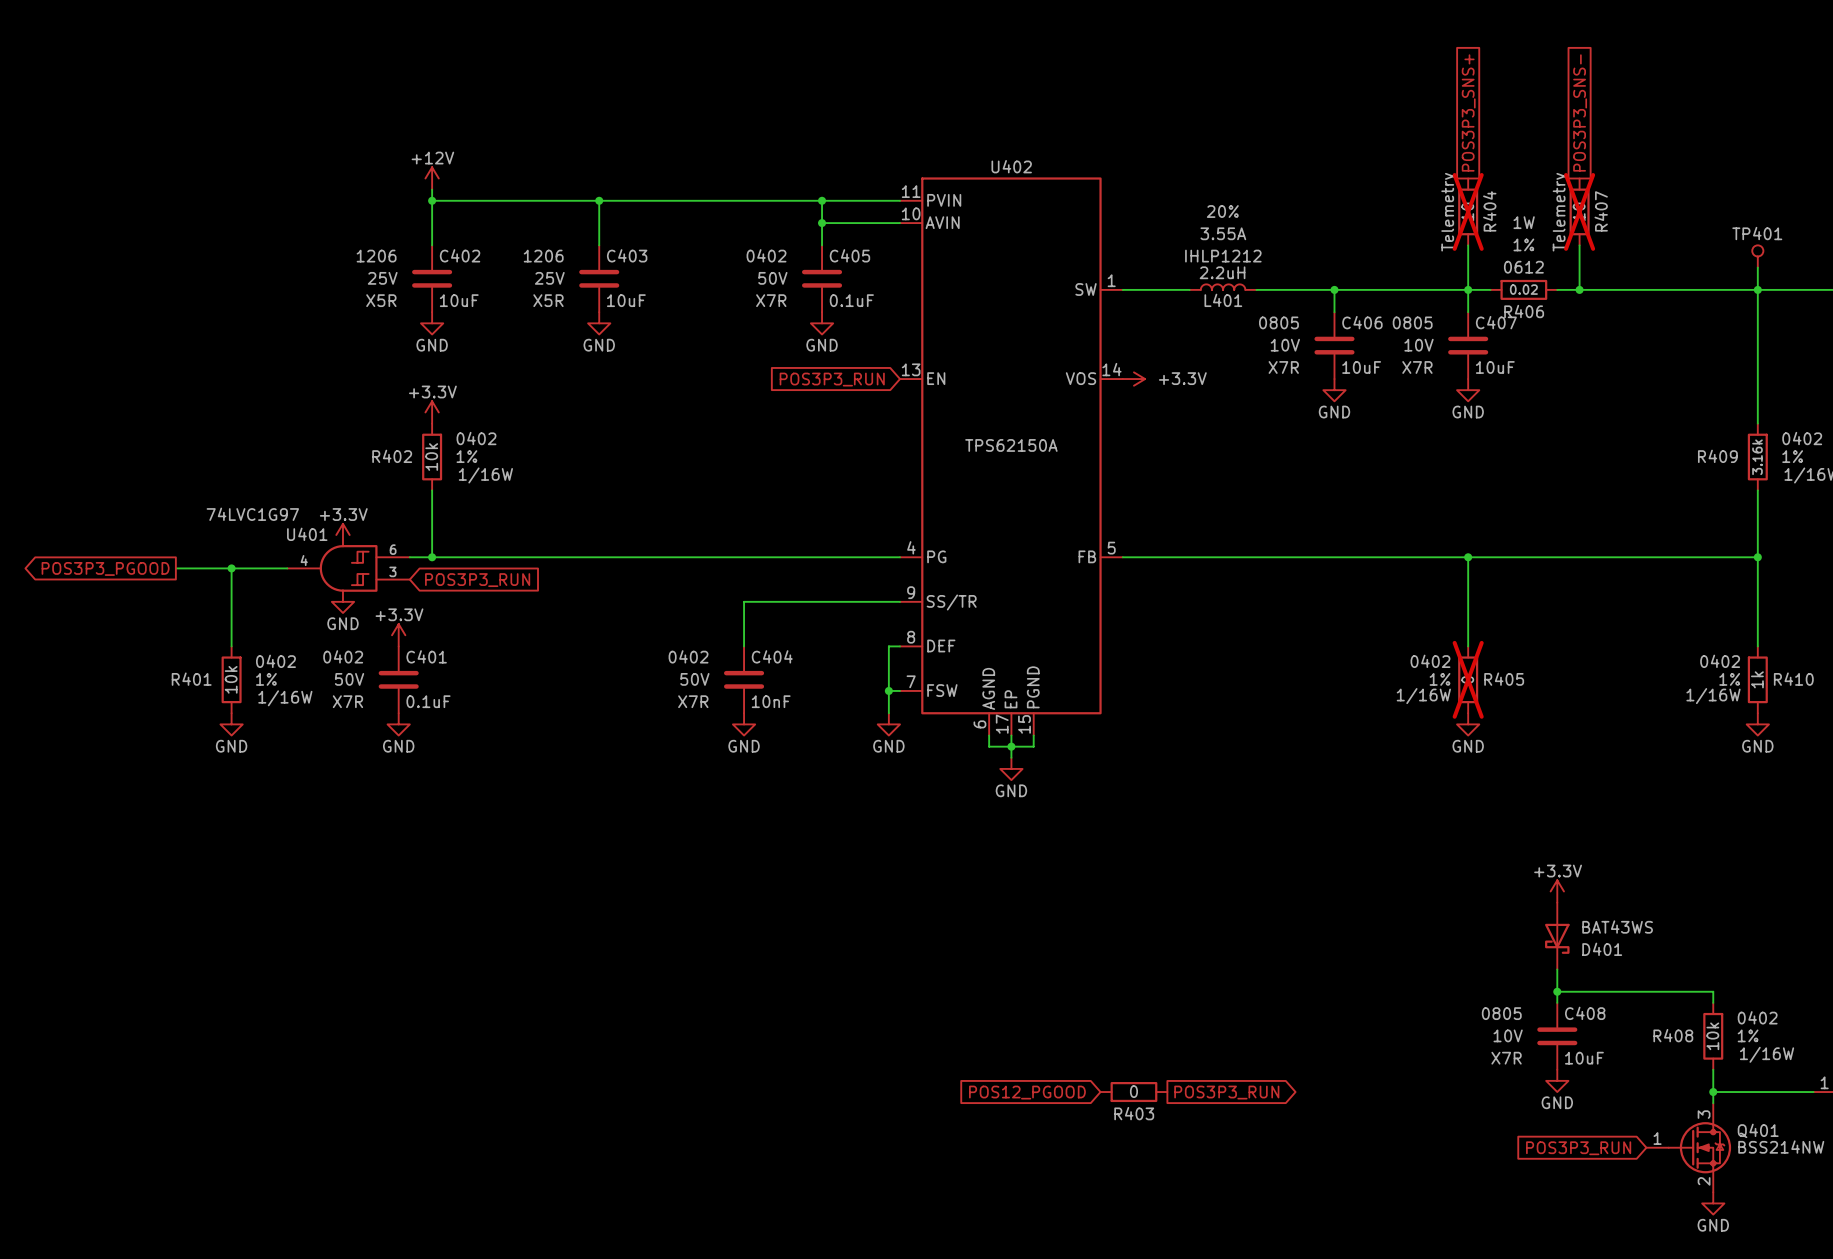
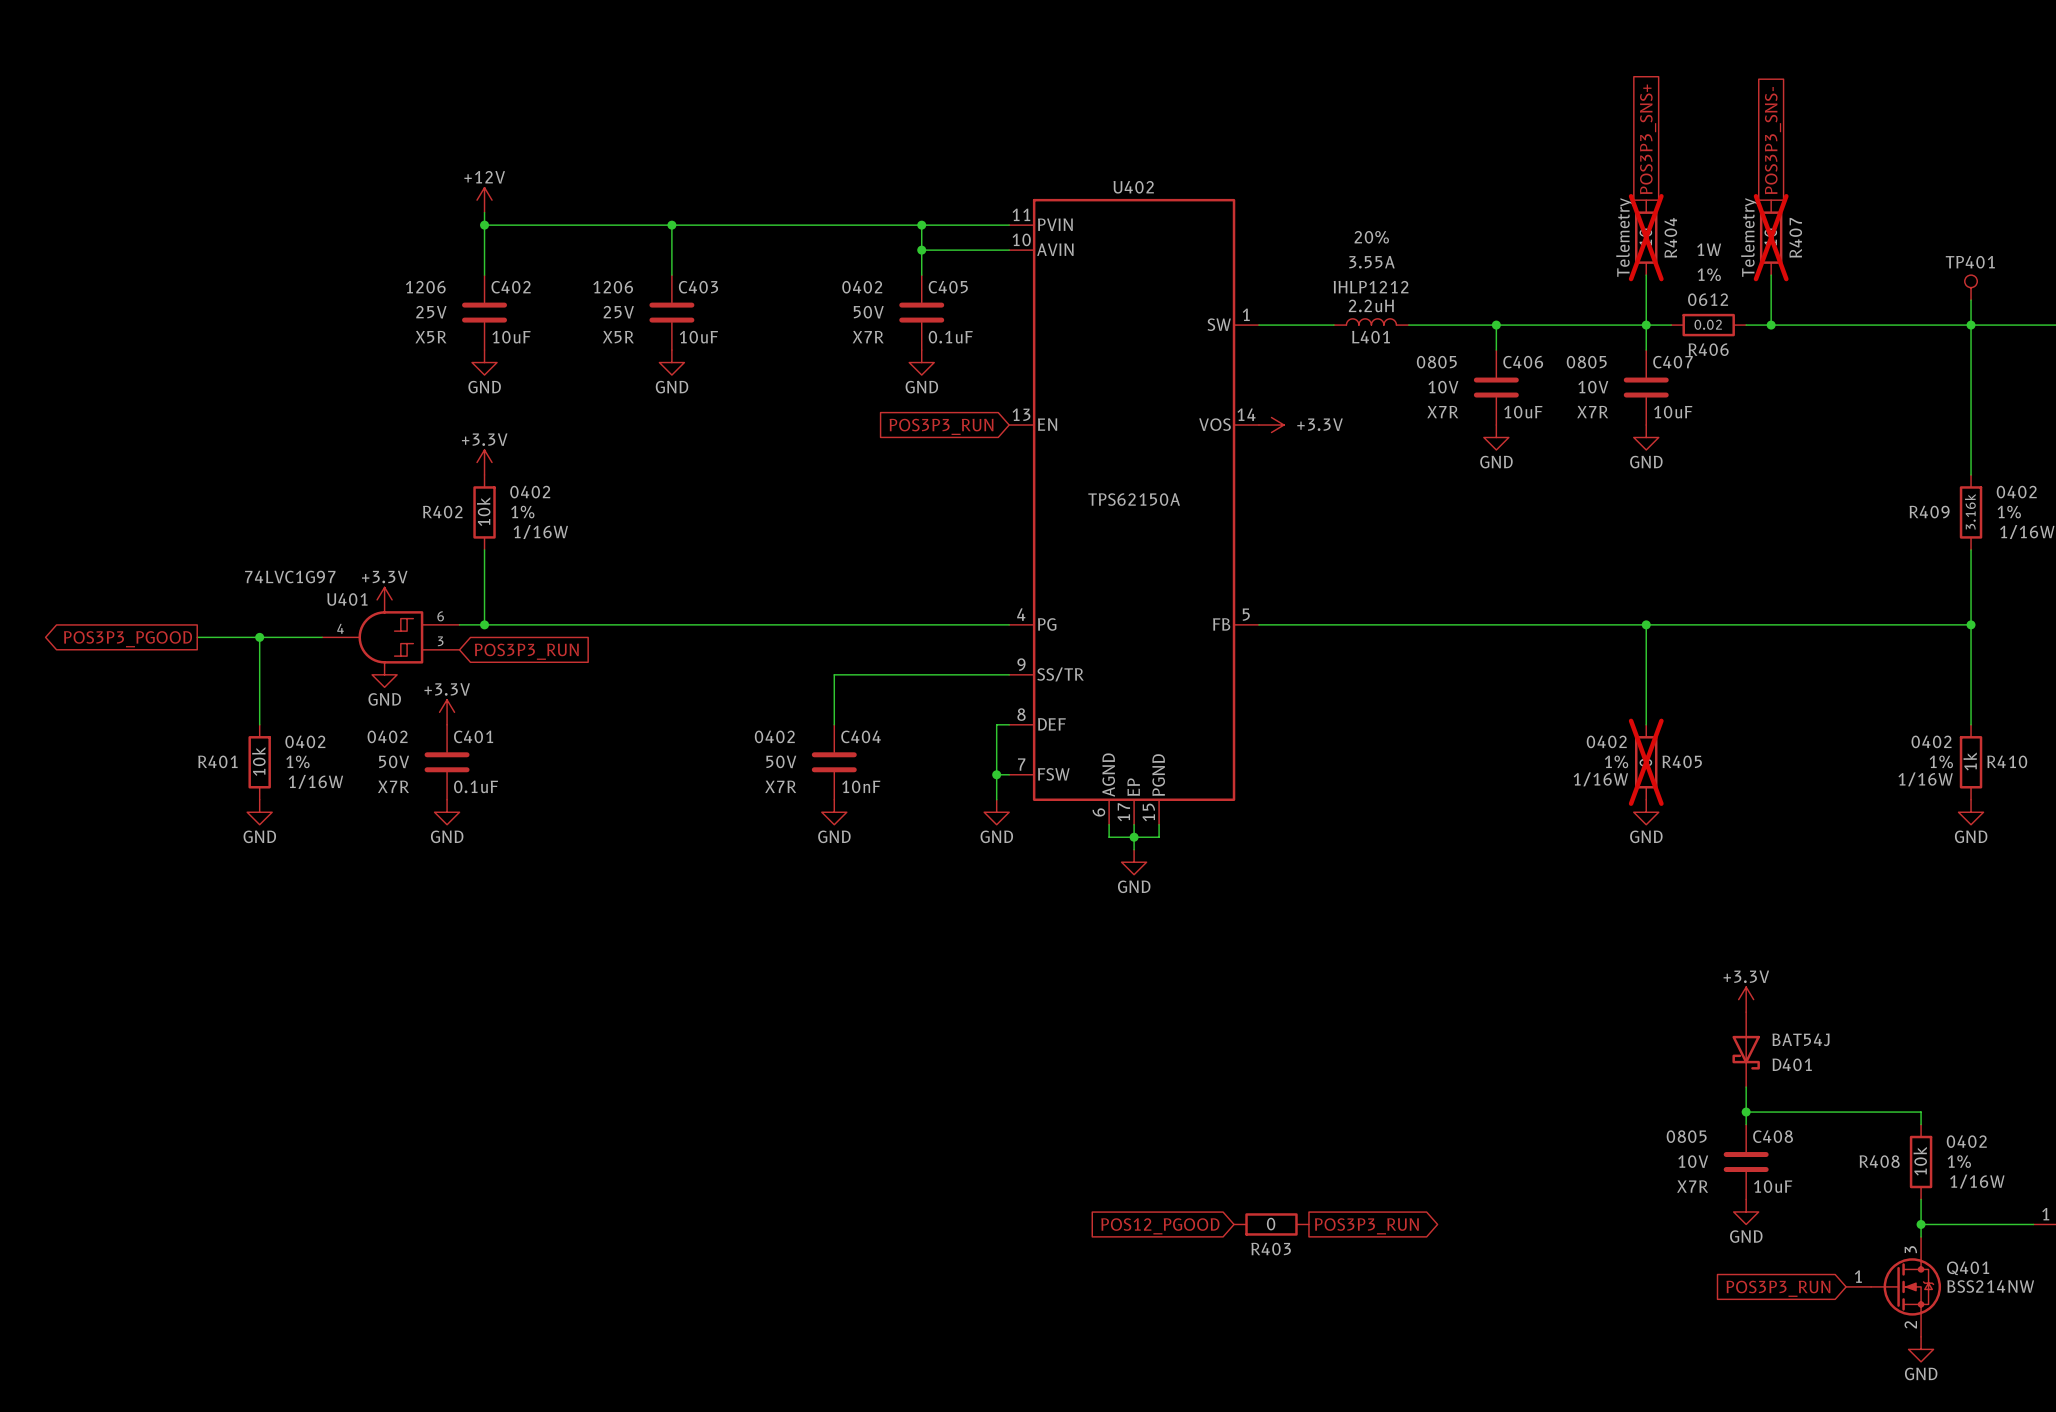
D401 value: BAT43WS (1617, 927) -> BAT54J (1800, 1039)

